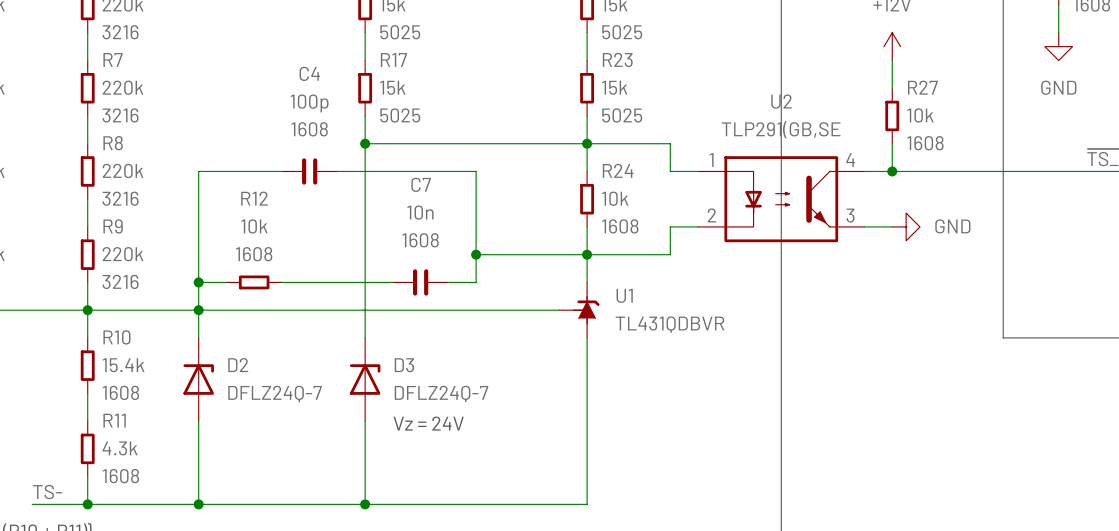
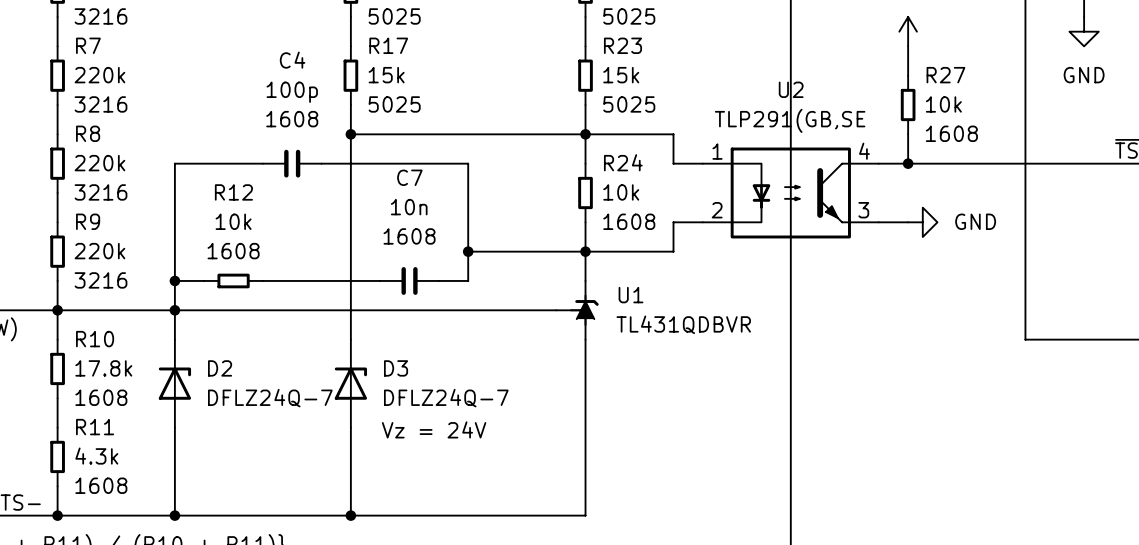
R10 value: 15.4k (123, 365) -> 17.8k (103, 368)

